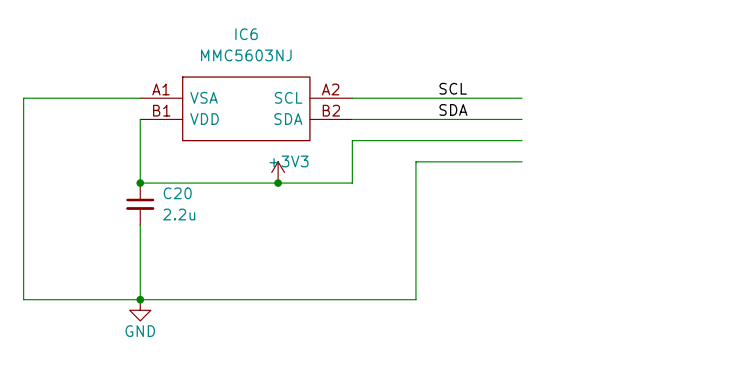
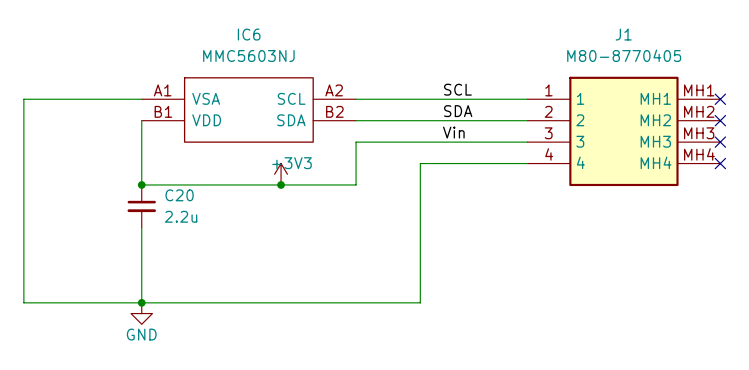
no-connect mark: none -> (720, 99)
no-connect mark: none -> (720, 120)
J1: none -> M80-8770405 (623, 131)
label: none -> Vin (453, 132)
no-connect mark: none -> (720, 142)
no-connect mark: none -> (720, 163)

